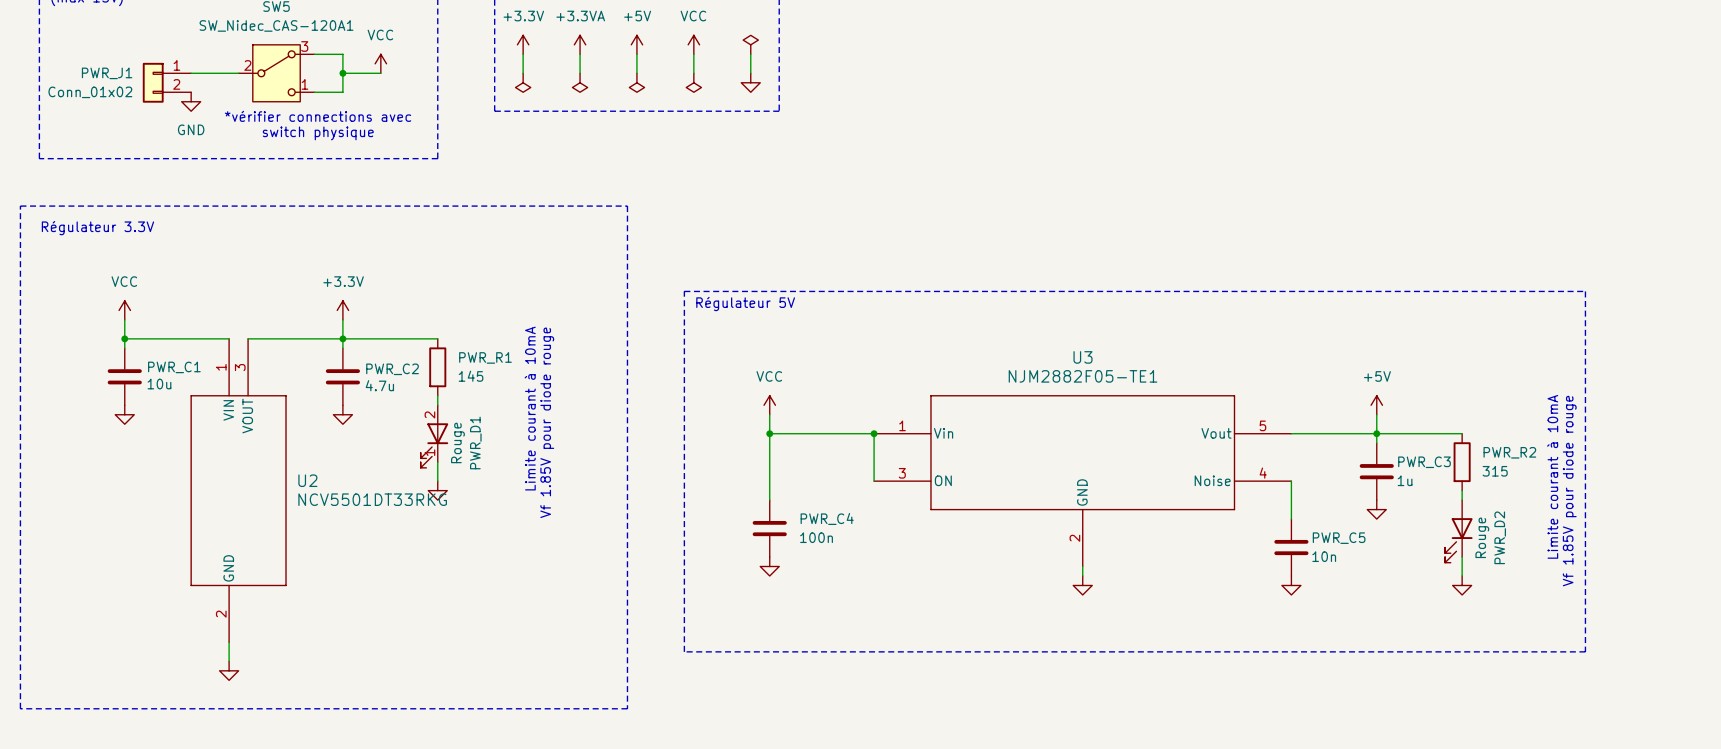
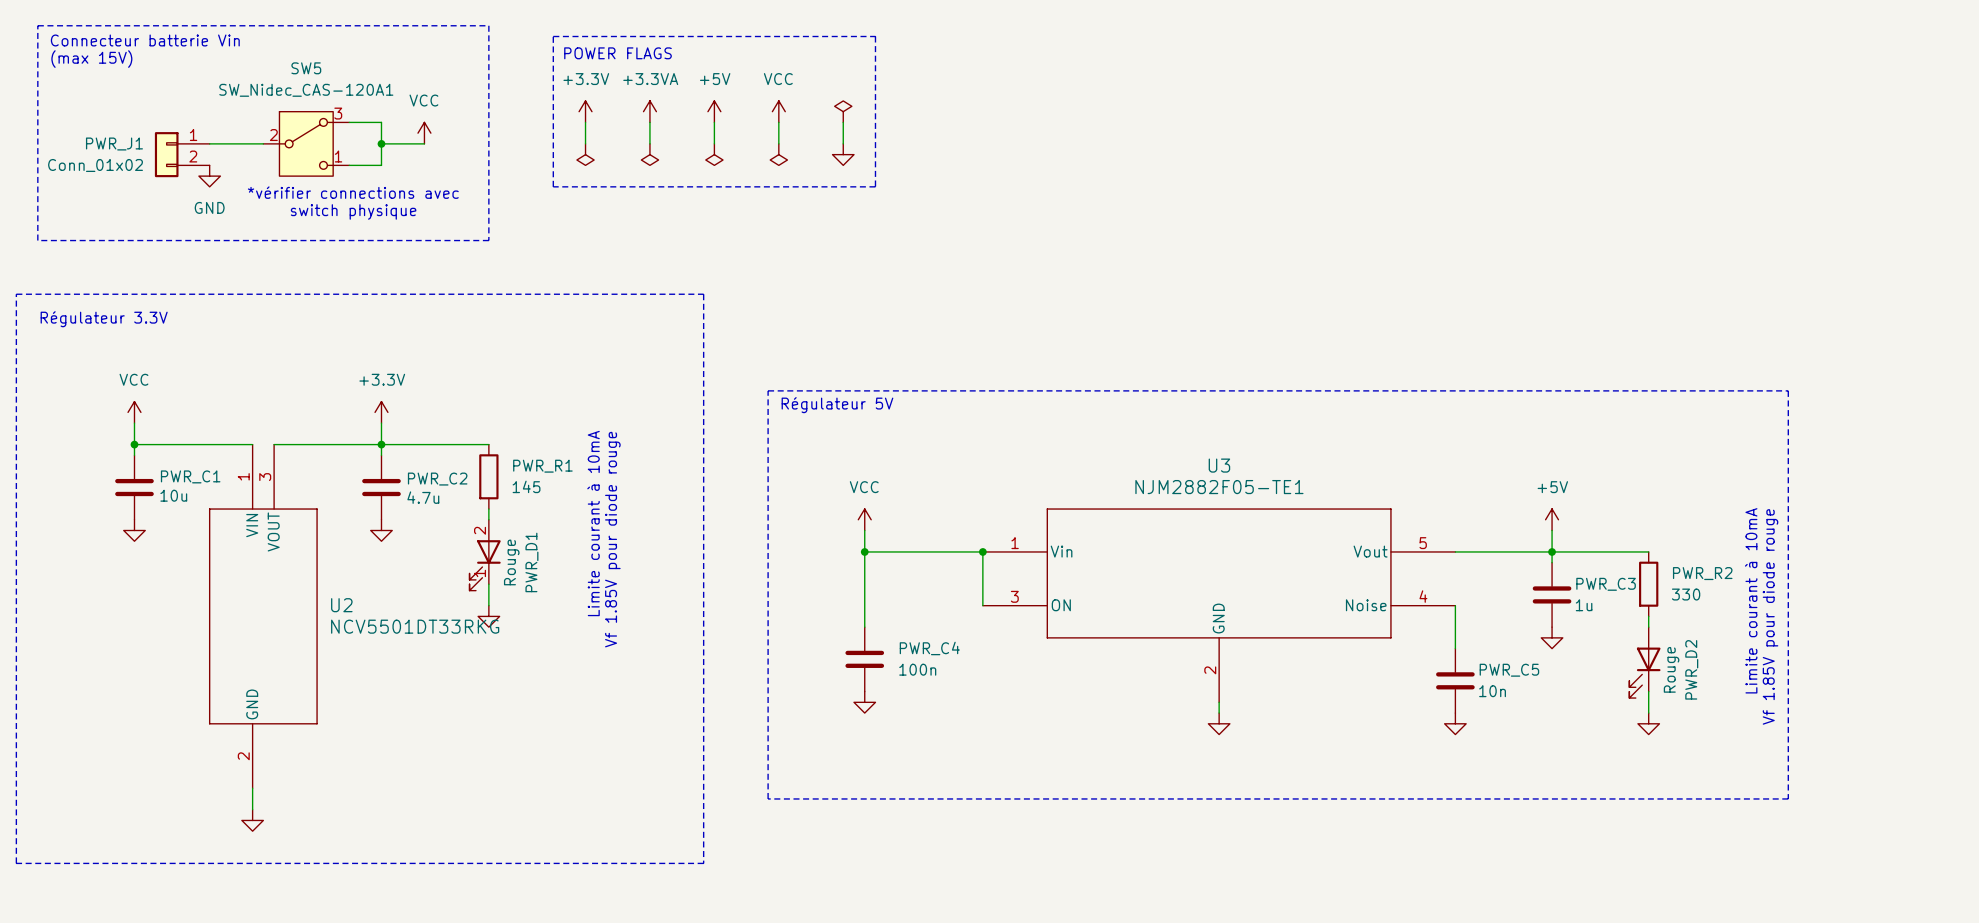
PWR_R2 value: 315 (1495, 471) -> 330 (1686, 594)

